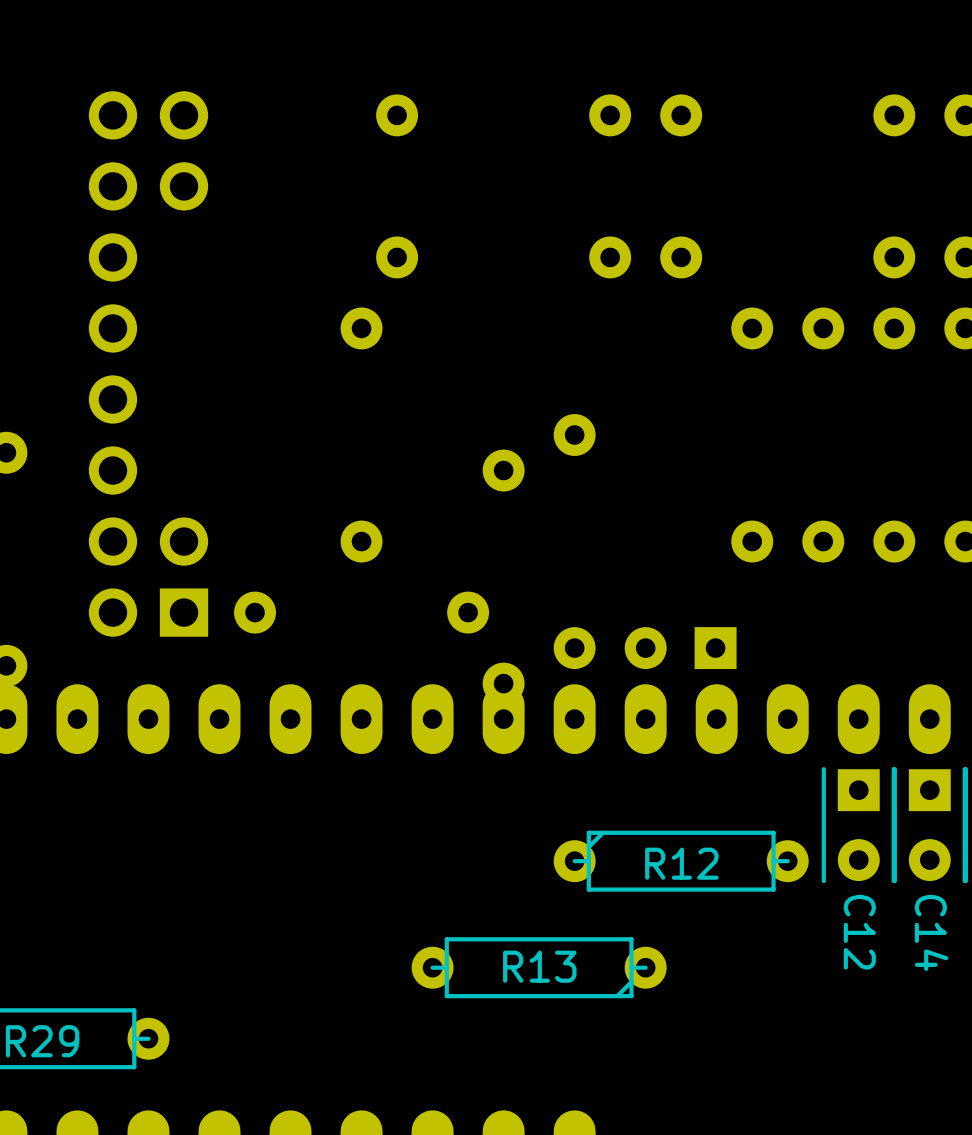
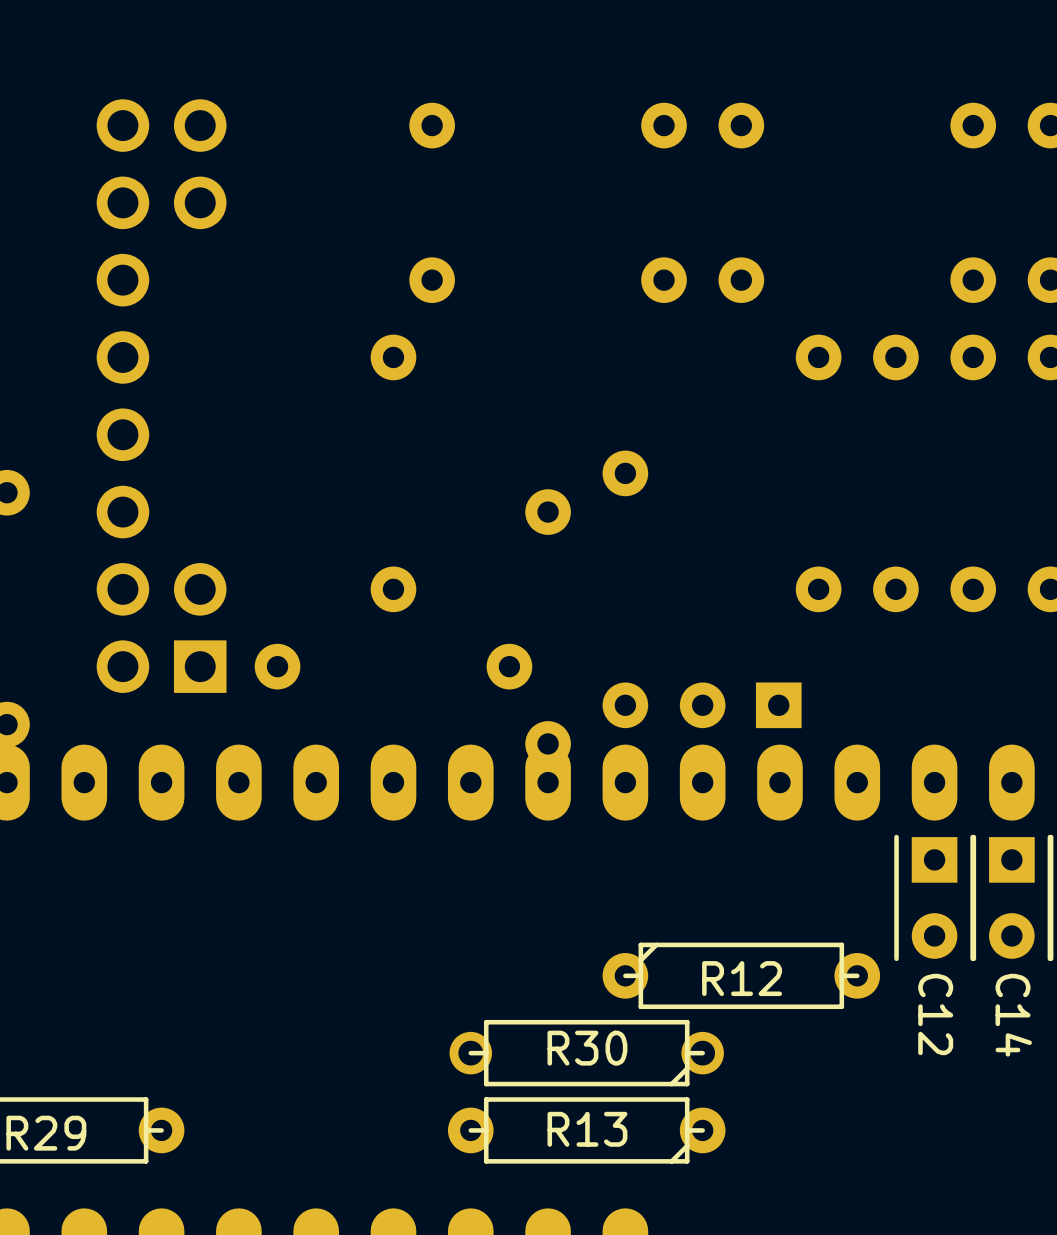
R12 position: (681, 861) -> (741, 975)
R13 position: (539, 967) -> (586, 1130)
R30: none -> (586, 1053)

